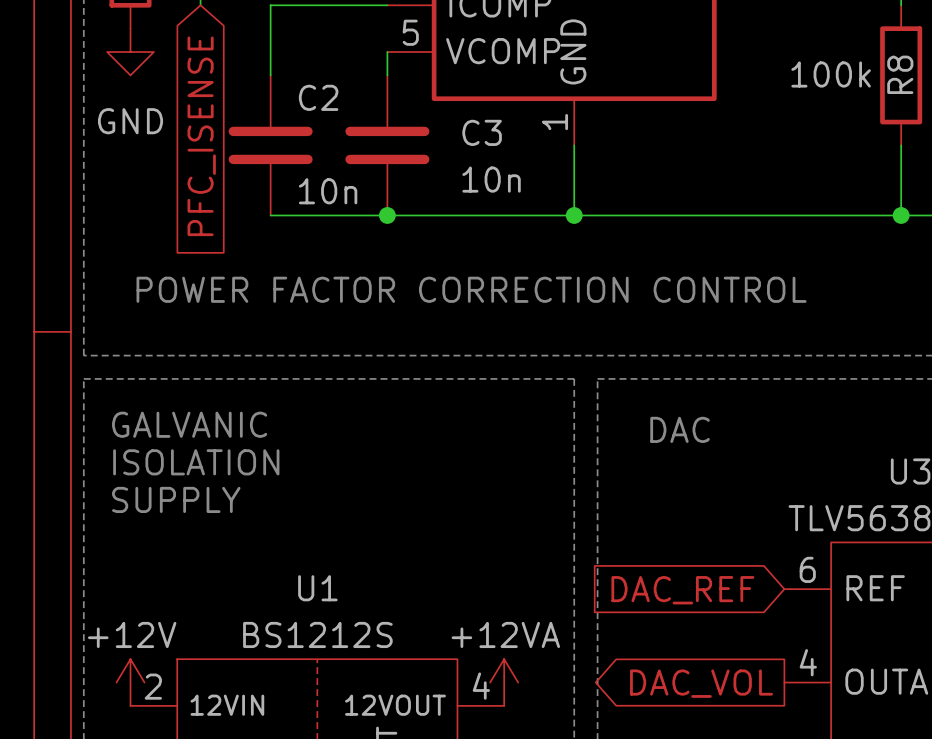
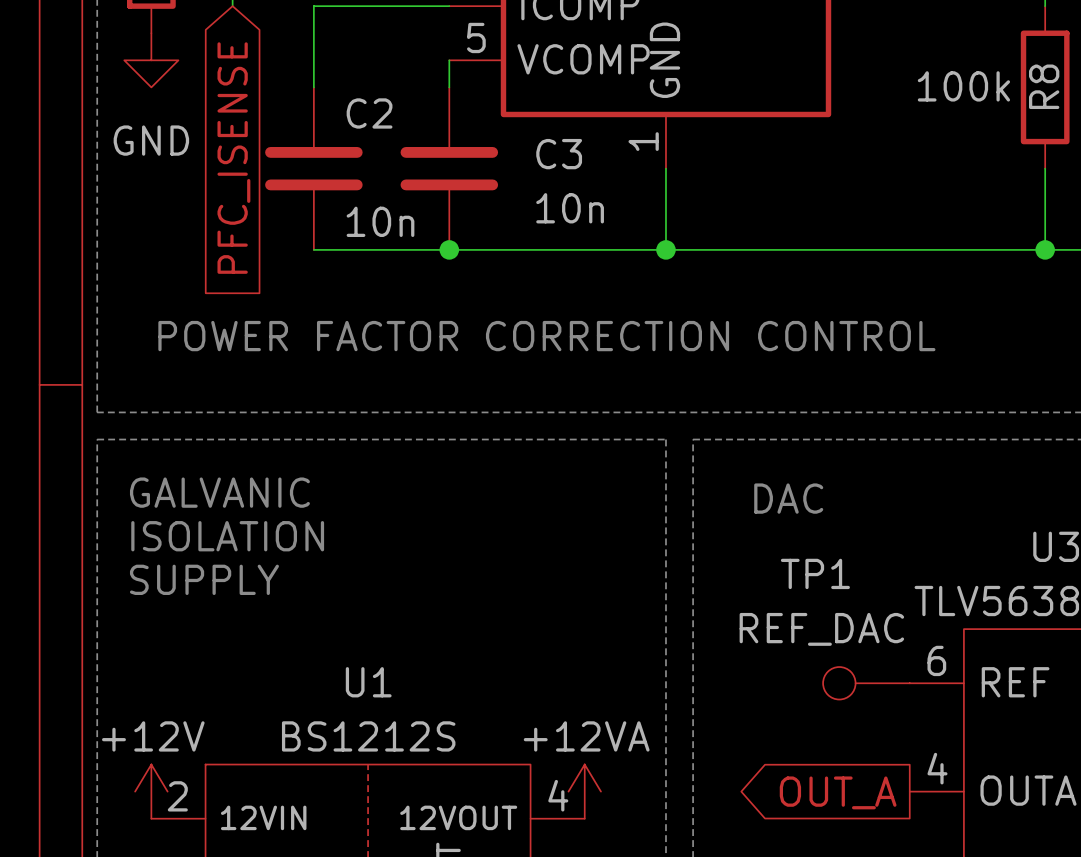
TP1: none -> REF_DAC (866, 683)
global label: DAC_REF (682, 590) -> none
global label: DAC_VOL (701, 683) -> OUT_A (838, 792)

